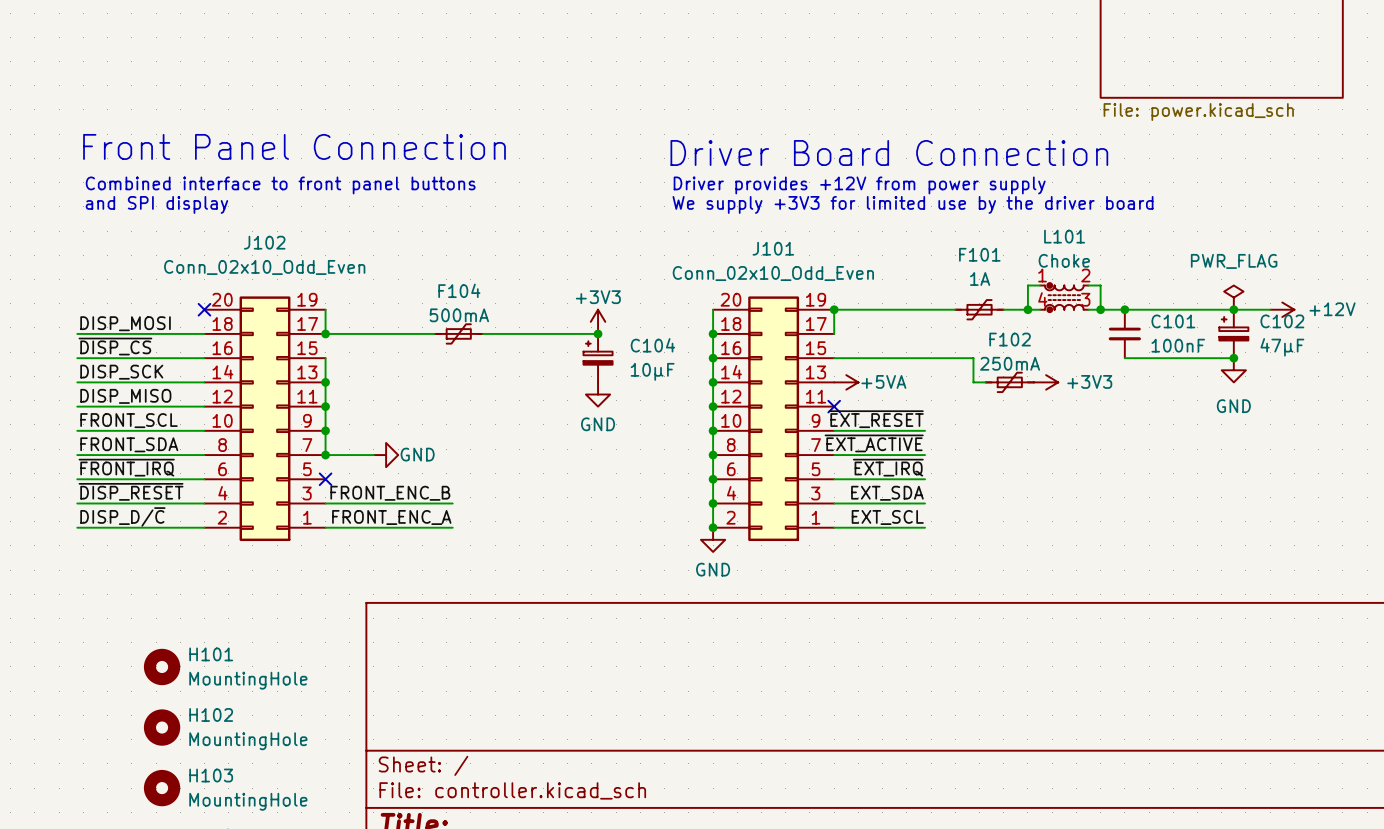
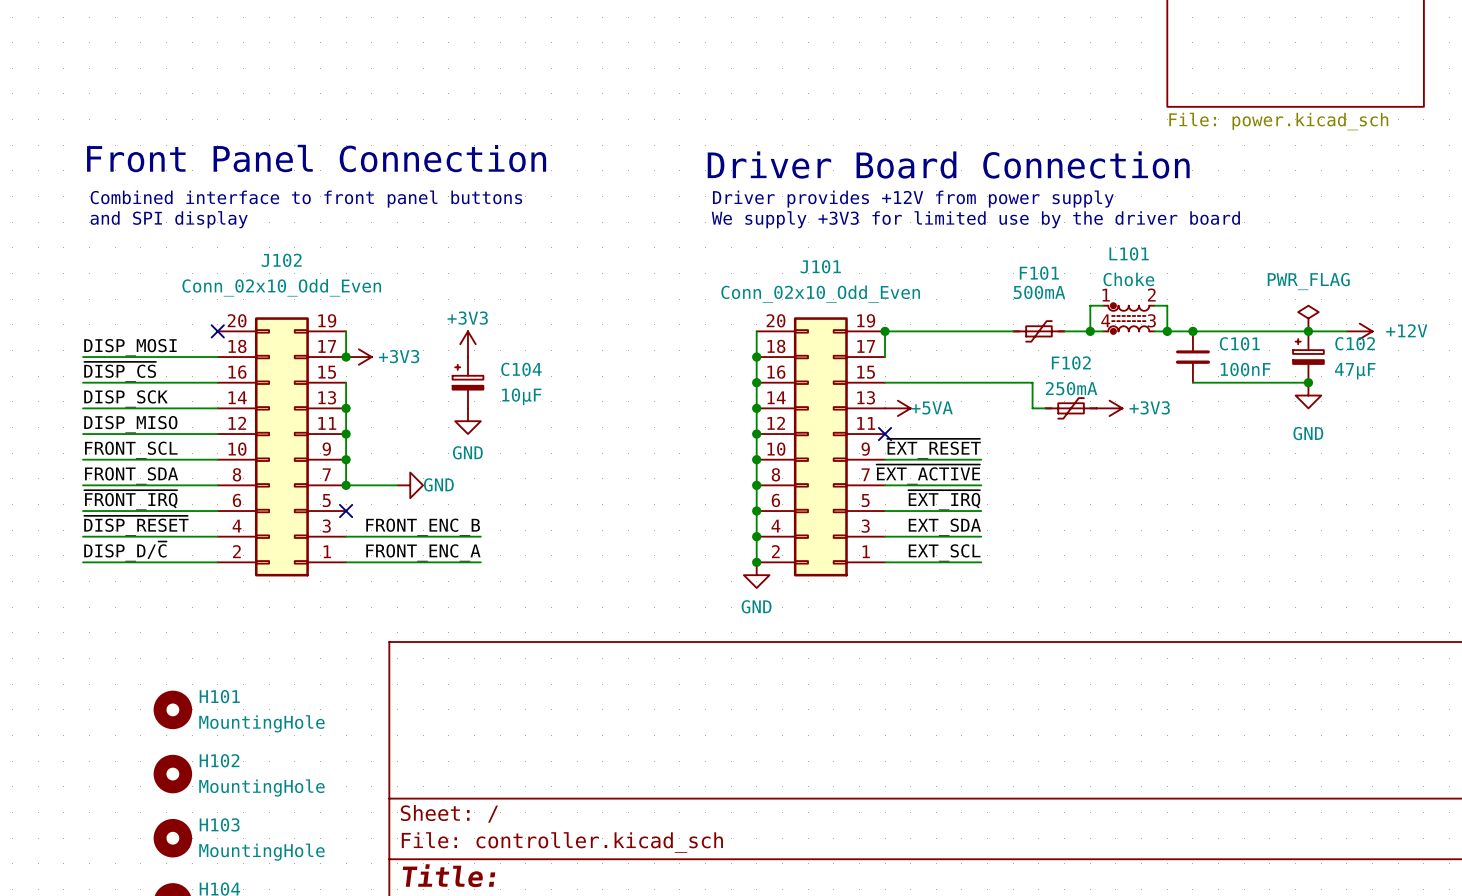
F101 value: 1A (980, 279) -> 500mA (1039, 292)
power symbol: none -> +3V3 (467, 344)
power symbol: +3V3 (598, 321) -> none
wire: (325, 333) (434, 333) -> none
power symbol: none -> +3V3 (358, 357)
F104: 500mA (458, 333) -> none
wire: (482, 333) (598, 333) -> none
junction: (598, 333) -> none
C104 position: (598, 358) -> (467, 382)
power symbol position: GND (598, 394) -> GND (467, 421)

